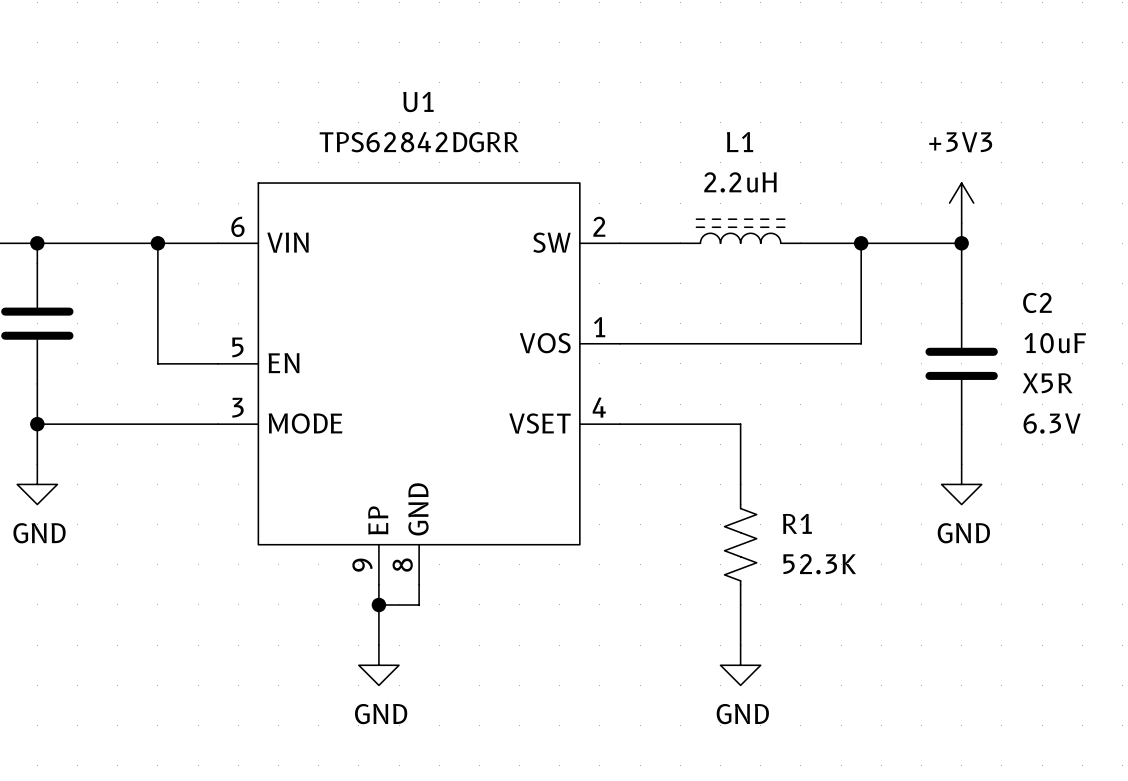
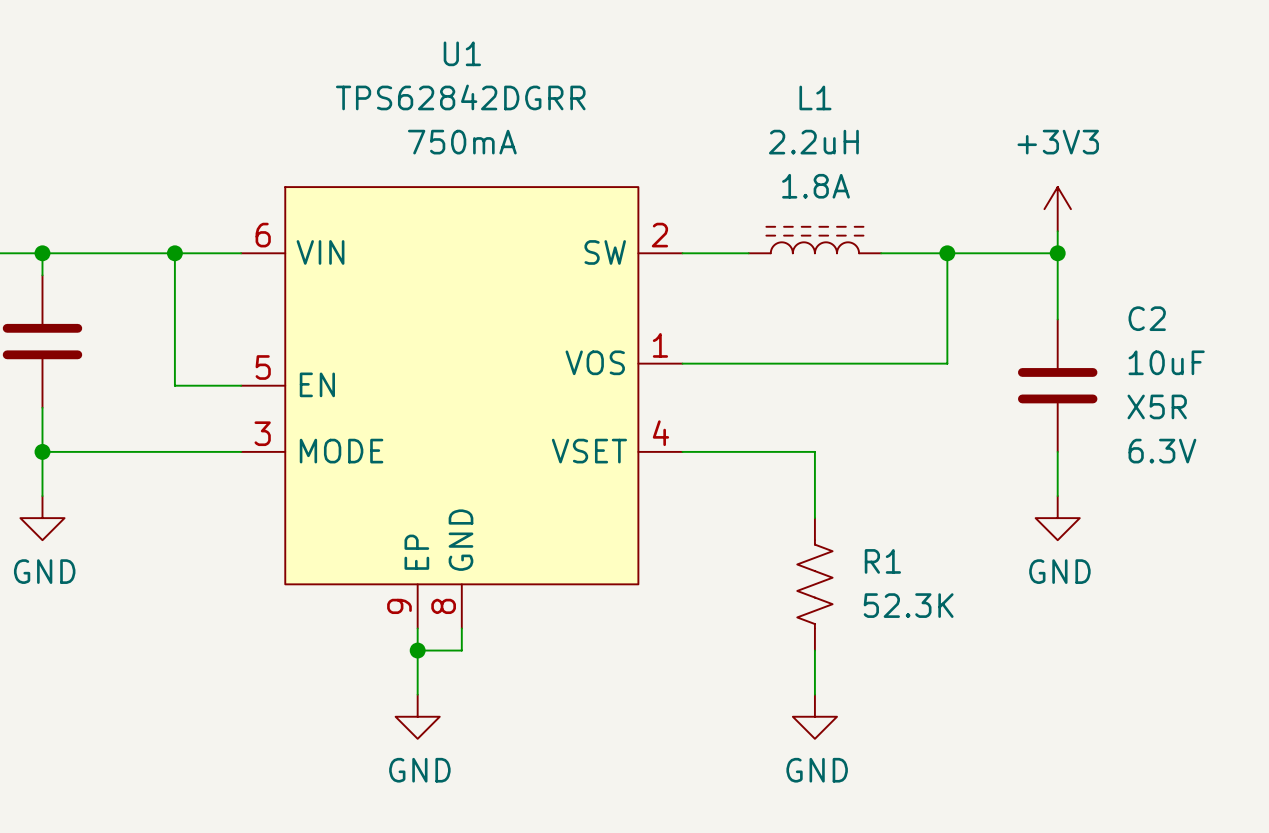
U1 name position: U1 (418, 102) -> U1 (462, 53)
U1 value position: TPS62842DGRR (419, 142) -> TPS62842DGRR (460, 97)
U1 text: none -> 750mA (462, 142)
L1 name position: L1 (740, 142) -> L1 (815, 97)
L1 value position: 2.2uH (740, 182) -> 2.2uH (813, 142)
L1 text: none -> 1.8A (815, 186)

